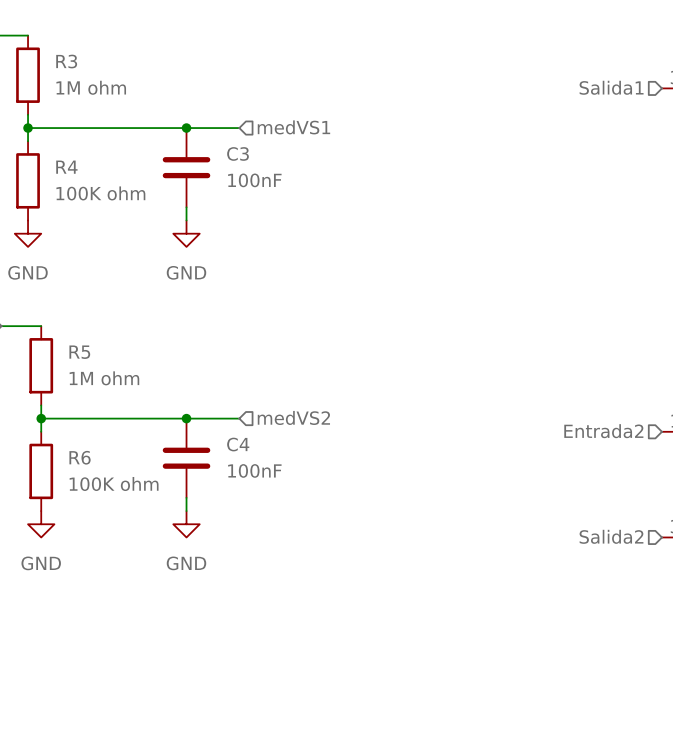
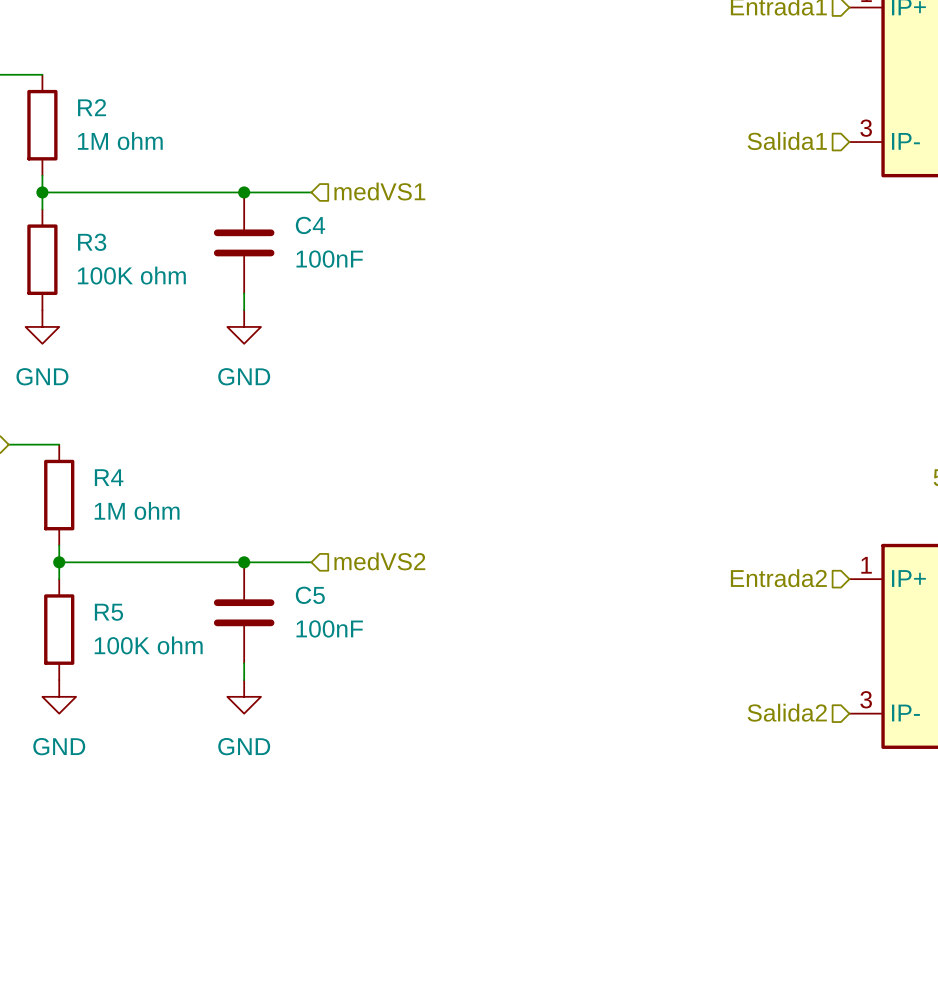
R3 name: R3 (66, 61) -> R2 (92, 107)
C3 name: C3 (238, 153) -> C4 (310, 225)
R4 name: R4 (66, 167) -> R3 (92, 242)
R5 name: R5 (79, 352) -> R4 (109, 477)
C4 name: C4 (238, 444) -> C5 (310, 595)
R6 name: R6 (80, 457) -> R5 (108, 612)

